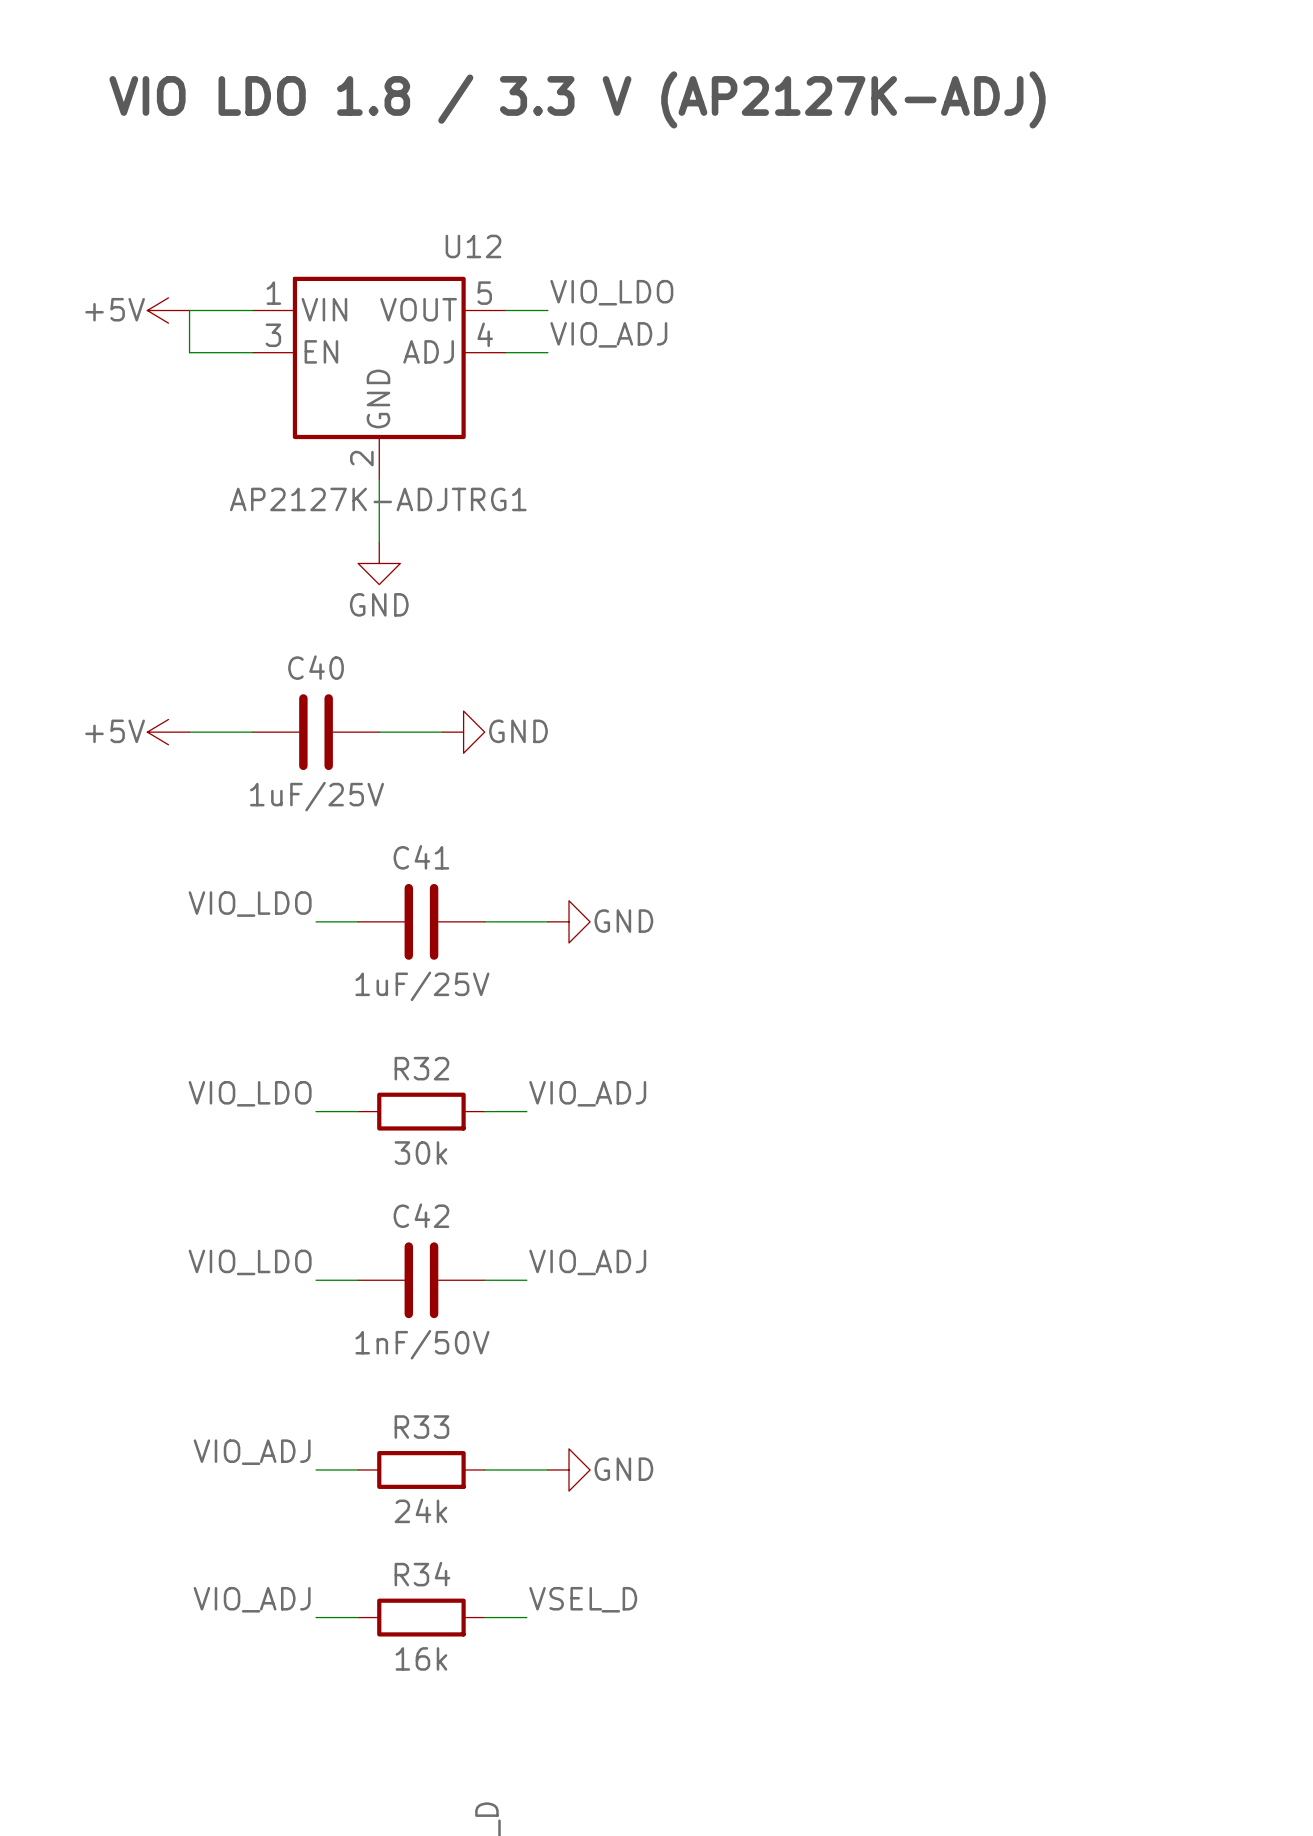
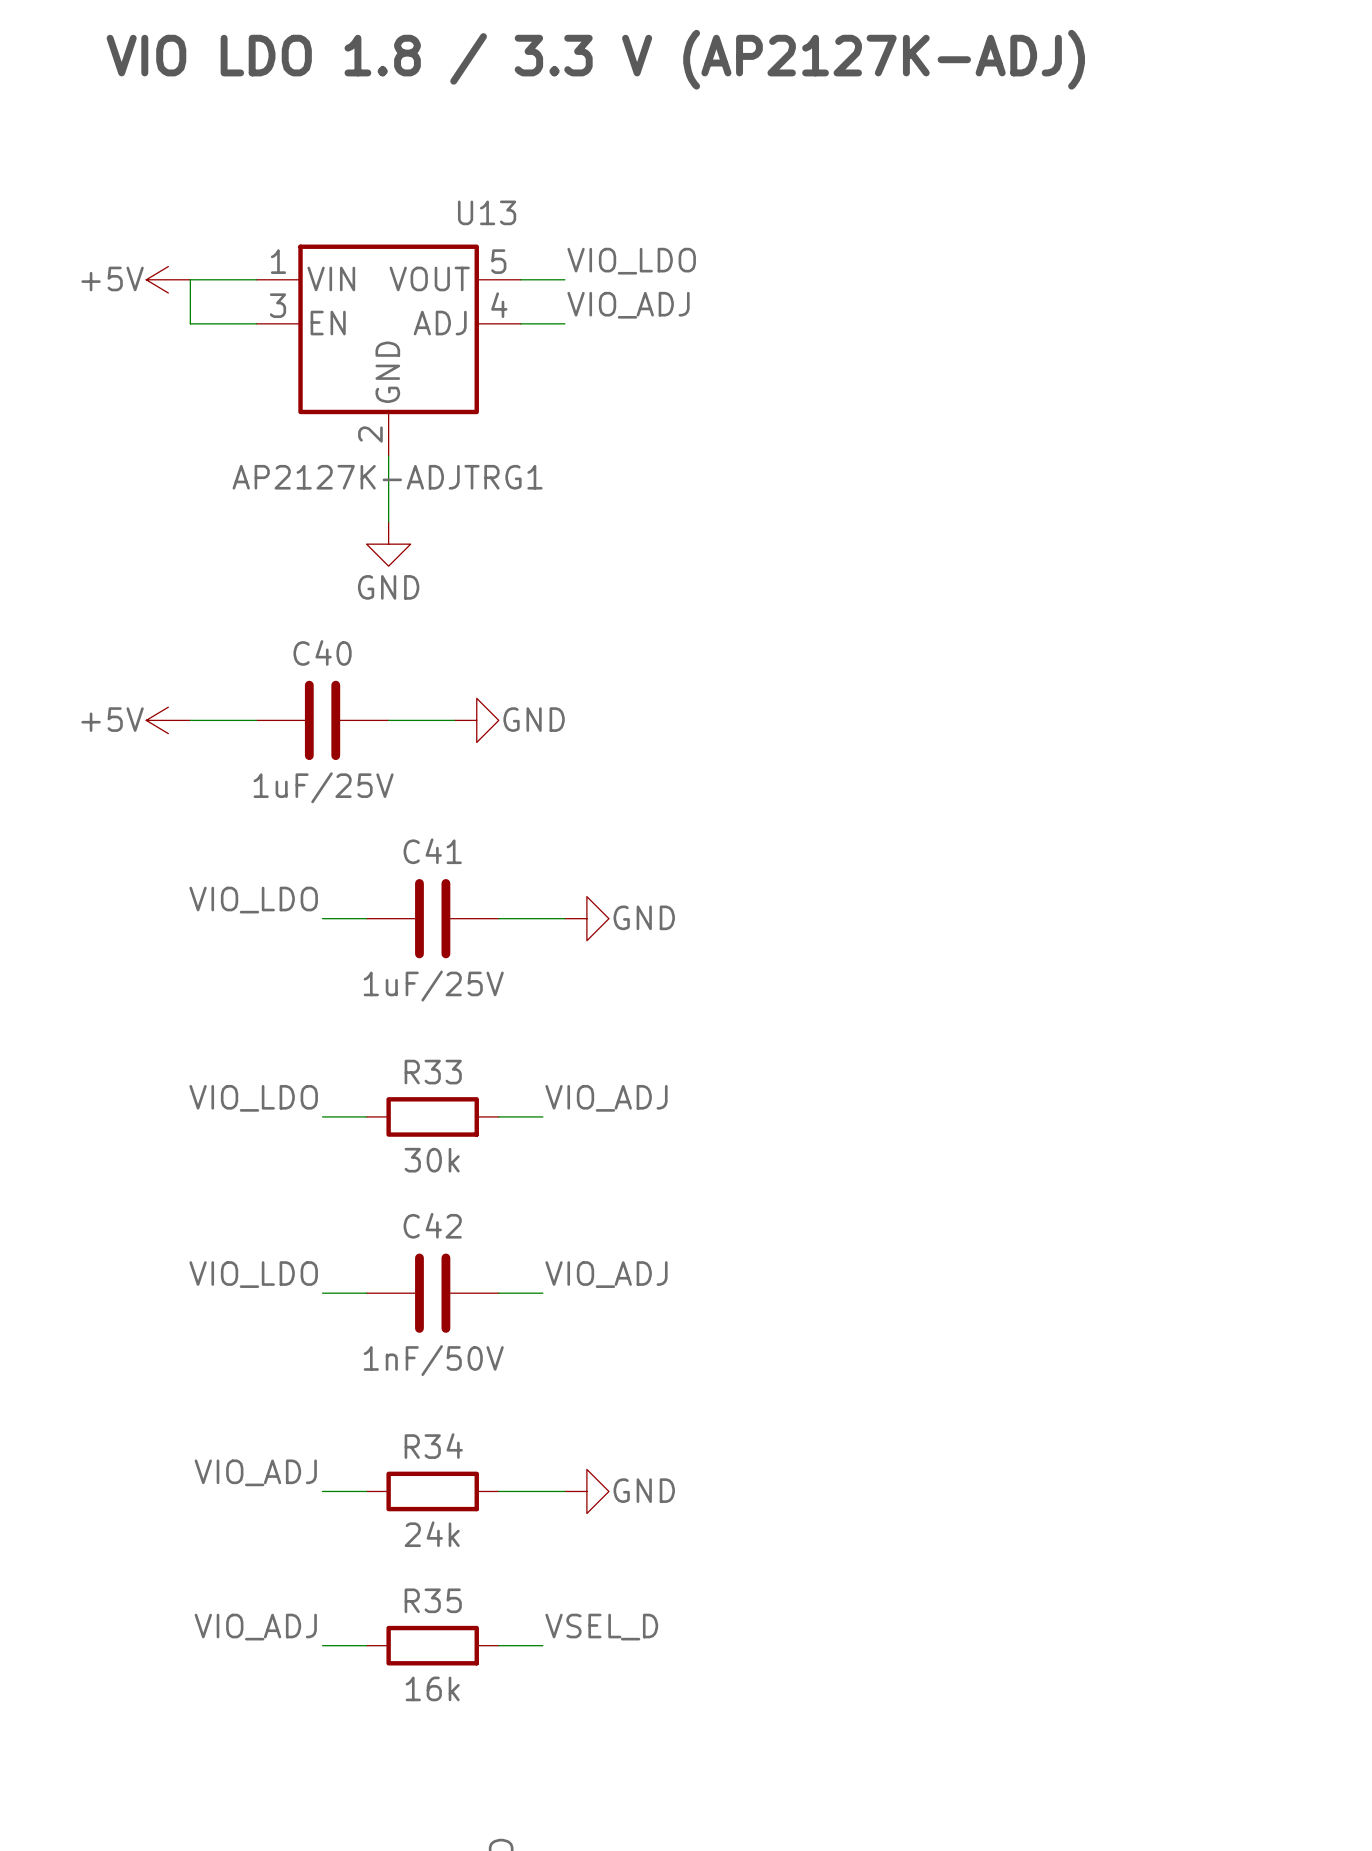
U12 name: U12 (473, 246) -> U13 (487, 212)
R32 name: R32 (421, 1068) -> R33 (433, 1072)
R33 name: R33 (421, 1427) -> R34 (433, 1446)
R34 name: R34 (422, 1574) -> R35 (433, 1600)

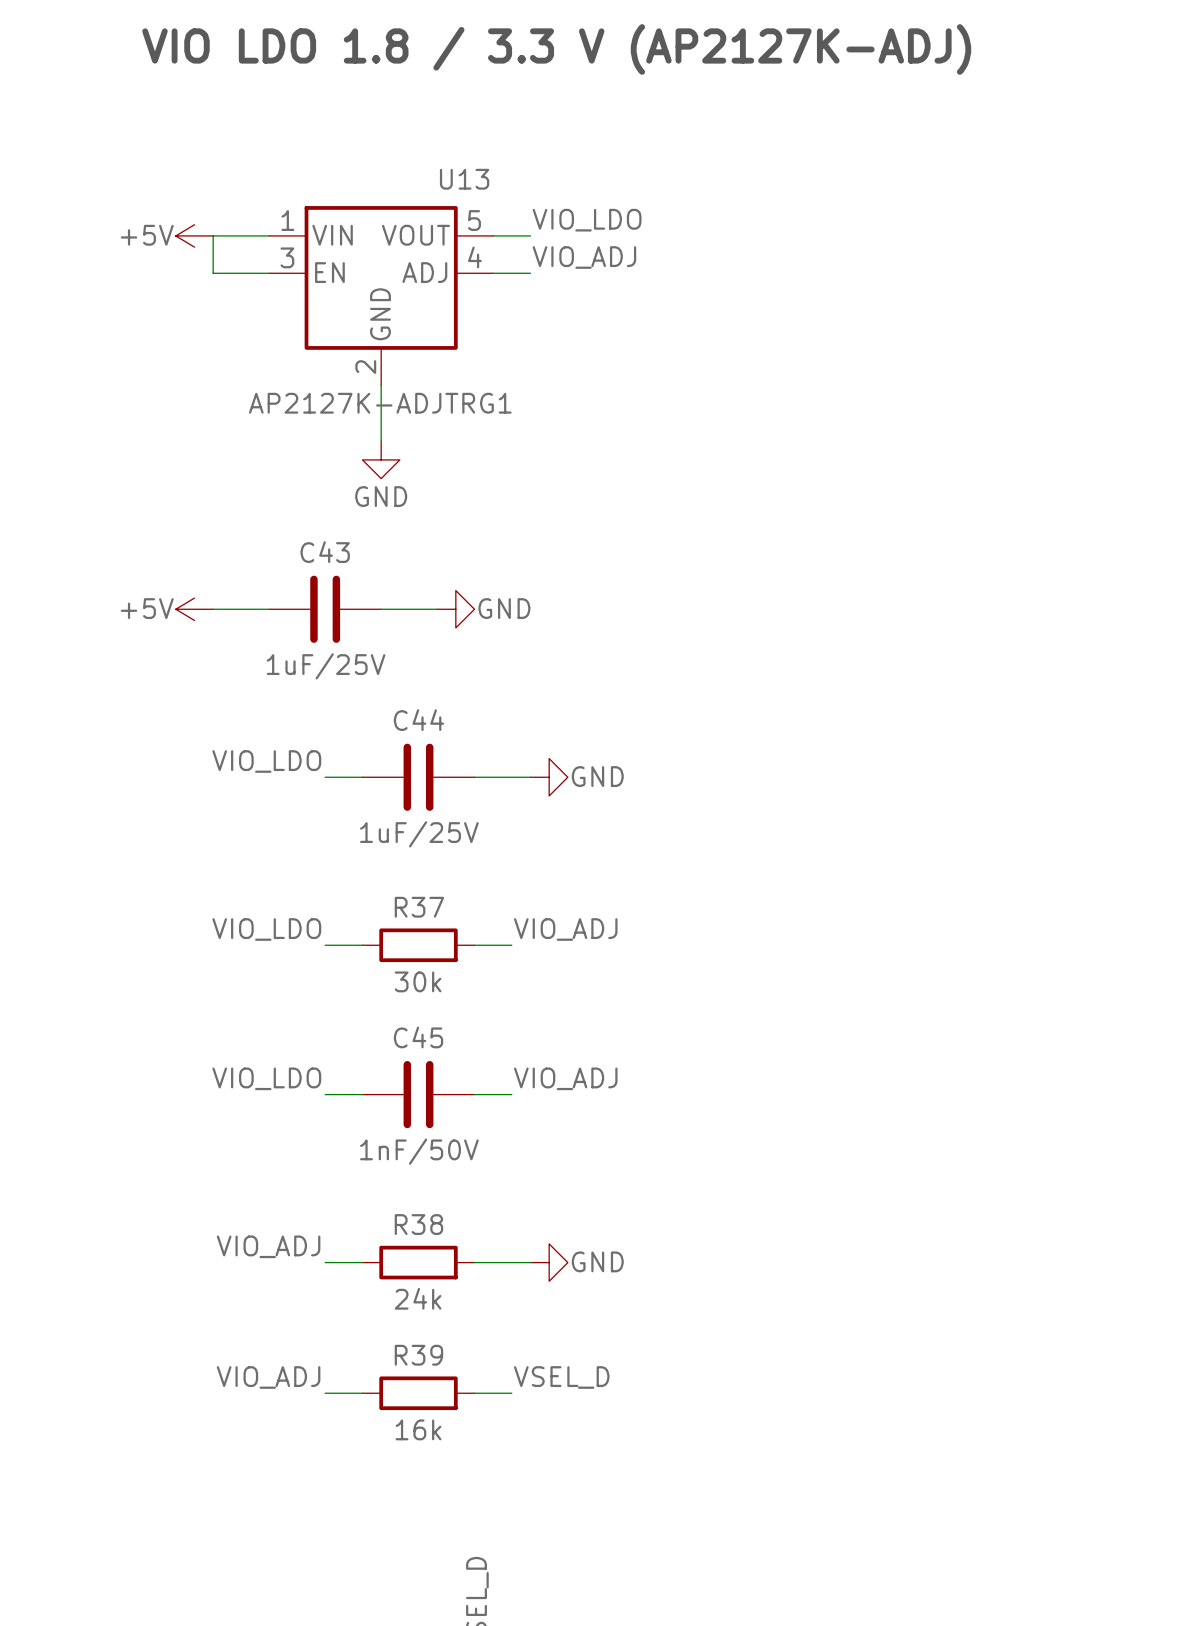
C40 name: C40 (322, 652) -> C43 (325, 552)
C41 name: C41 (432, 851) -> C44 (418, 720)
R33 name: R33 (433, 1072) -> R37 (419, 907)
C42 name: C42 (432, 1225) -> C45 (418, 1037)
R34 name: R34 (433, 1446) -> R38 (418, 1224)
R35 name: R35 (433, 1600) -> R39 (418, 1355)

